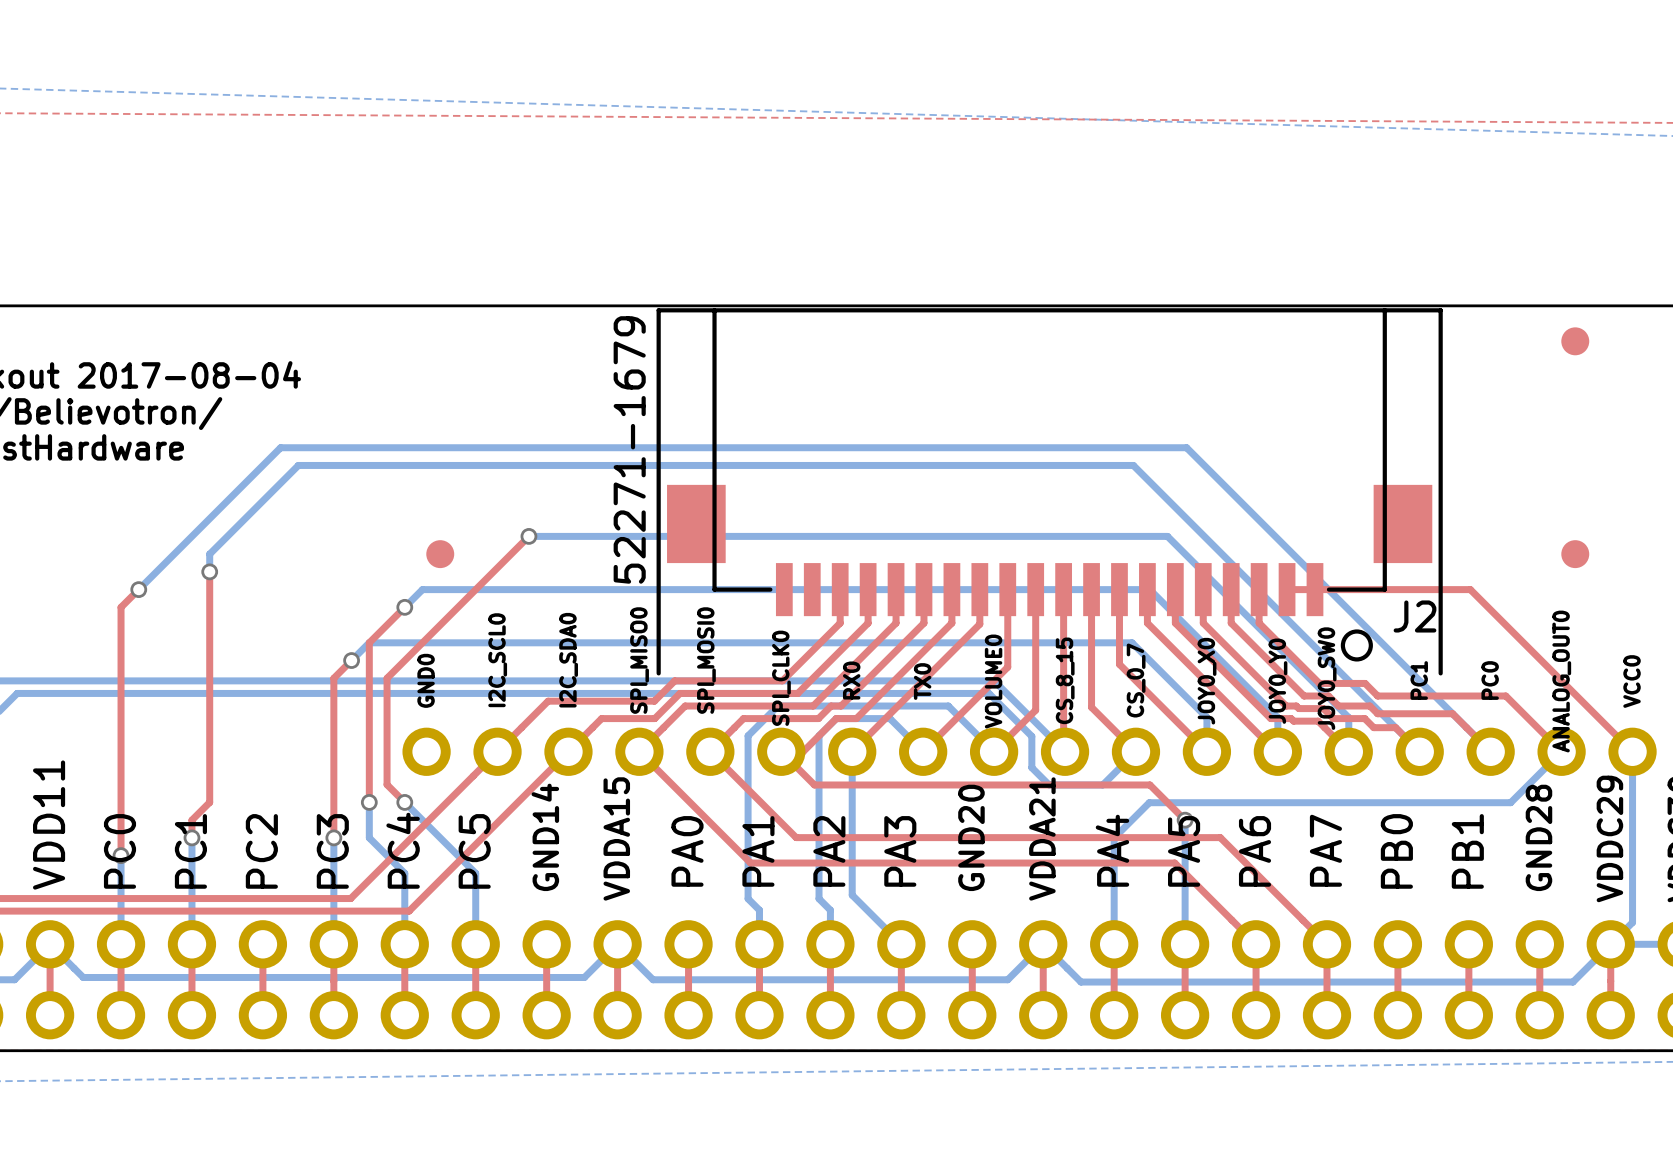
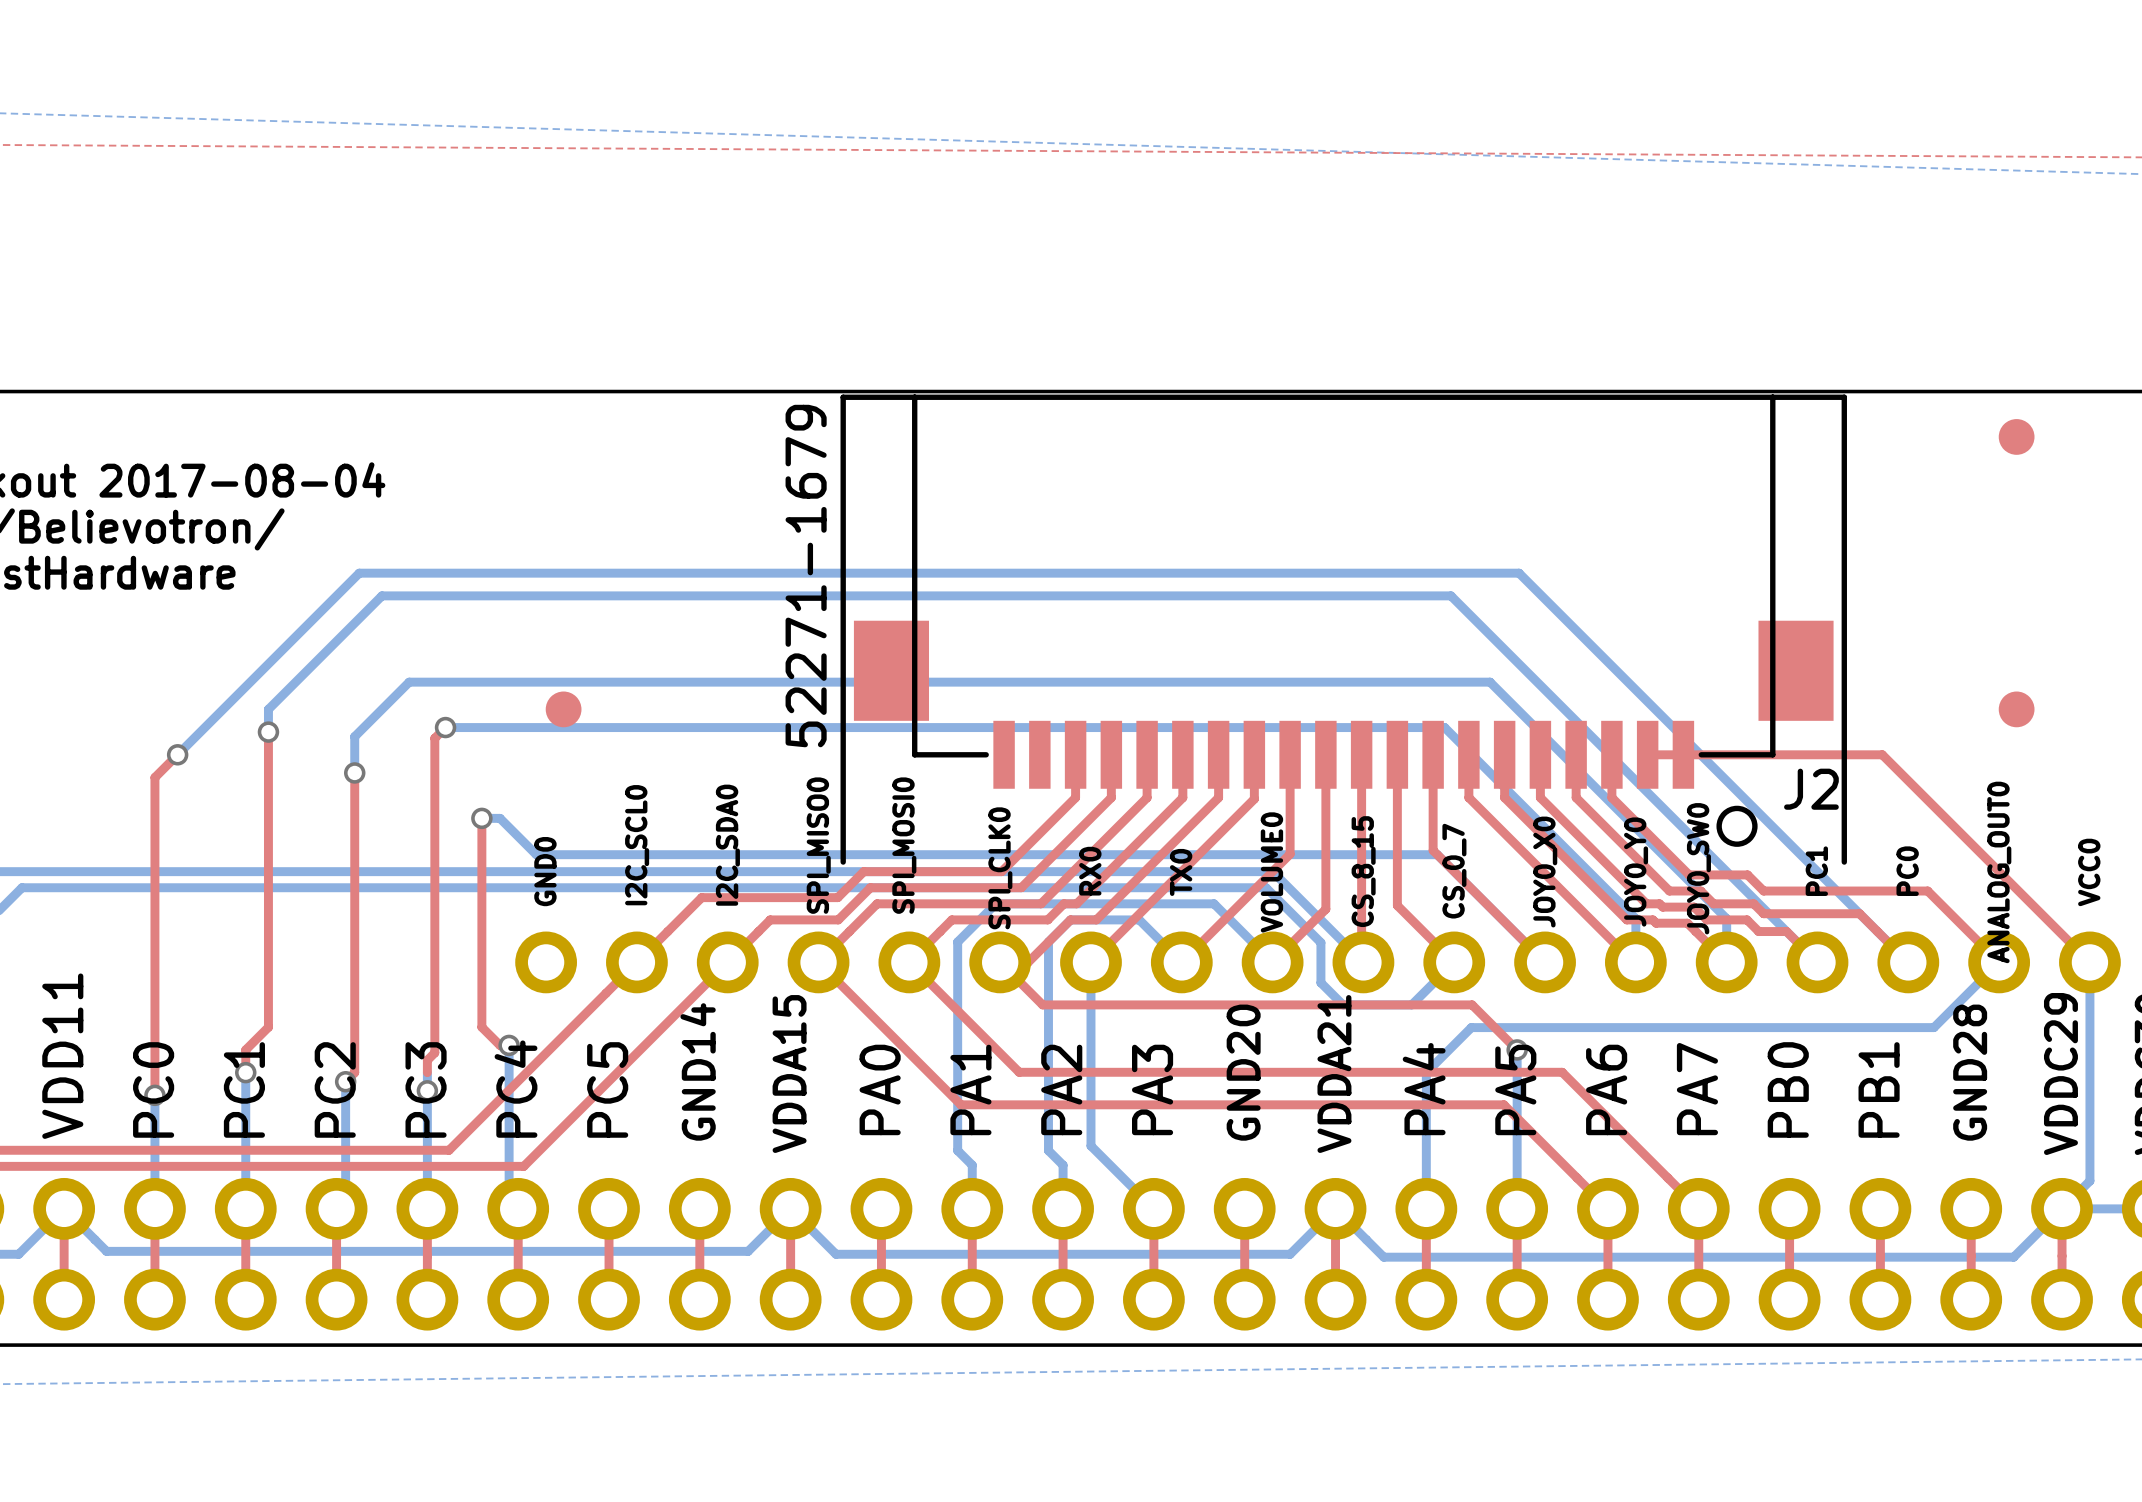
top track: (528, 536) (387, 678) (387, 784) (404, 802) -> none
bottom track: (528, 536) (1167, 536) -> (354, 772) (354, 736) (409, 682) (1490, 682) (1494, 686)
via: (528, 536) -> none
via: none -> (445, 727)
bottom track: (1149, 589) (422, 589) (404, 607) -> (1471, 754) (1444, 727) (445, 727)
top track: none -> (354, 772) (354, 1072) (345, 1081)
via: none -> (354, 772)
top track: (404, 607) (369, 642) (369, 802) -> none
via: (404, 607) -> none
top track: none -> (481, 818) (481, 1027) (500, 1045) (509, 1045)
via: none -> (481, 818)
top track: (351, 660) (333, 678) (333, 828) -> (445, 727) (434, 738) (434, 1052) (427, 1060)
bottom track: (351, 660) (369, 642) (1132, 642) (1206, 717) (1206, 751) -> (481, 818) (500, 818) (536, 854) (1437, 854) (1545, 962)
via: (351, 660) -> none
bottom track: (369, 802) (369, 837) (404, 873) (404, 944) -> (509, 1045) (509, 1199) (518, 1208)
via: (369, 802) -> none
bottom track: (404, 802) (475, 873) (475, 944) -> none
via position: (404, 802) -> (509, 1045)
via position: (333, 837) -> (427, 1090)
bottom track: none -> (345, 1081) (345, 1199) (336, 1208)
via: none -> (345, 1081)

